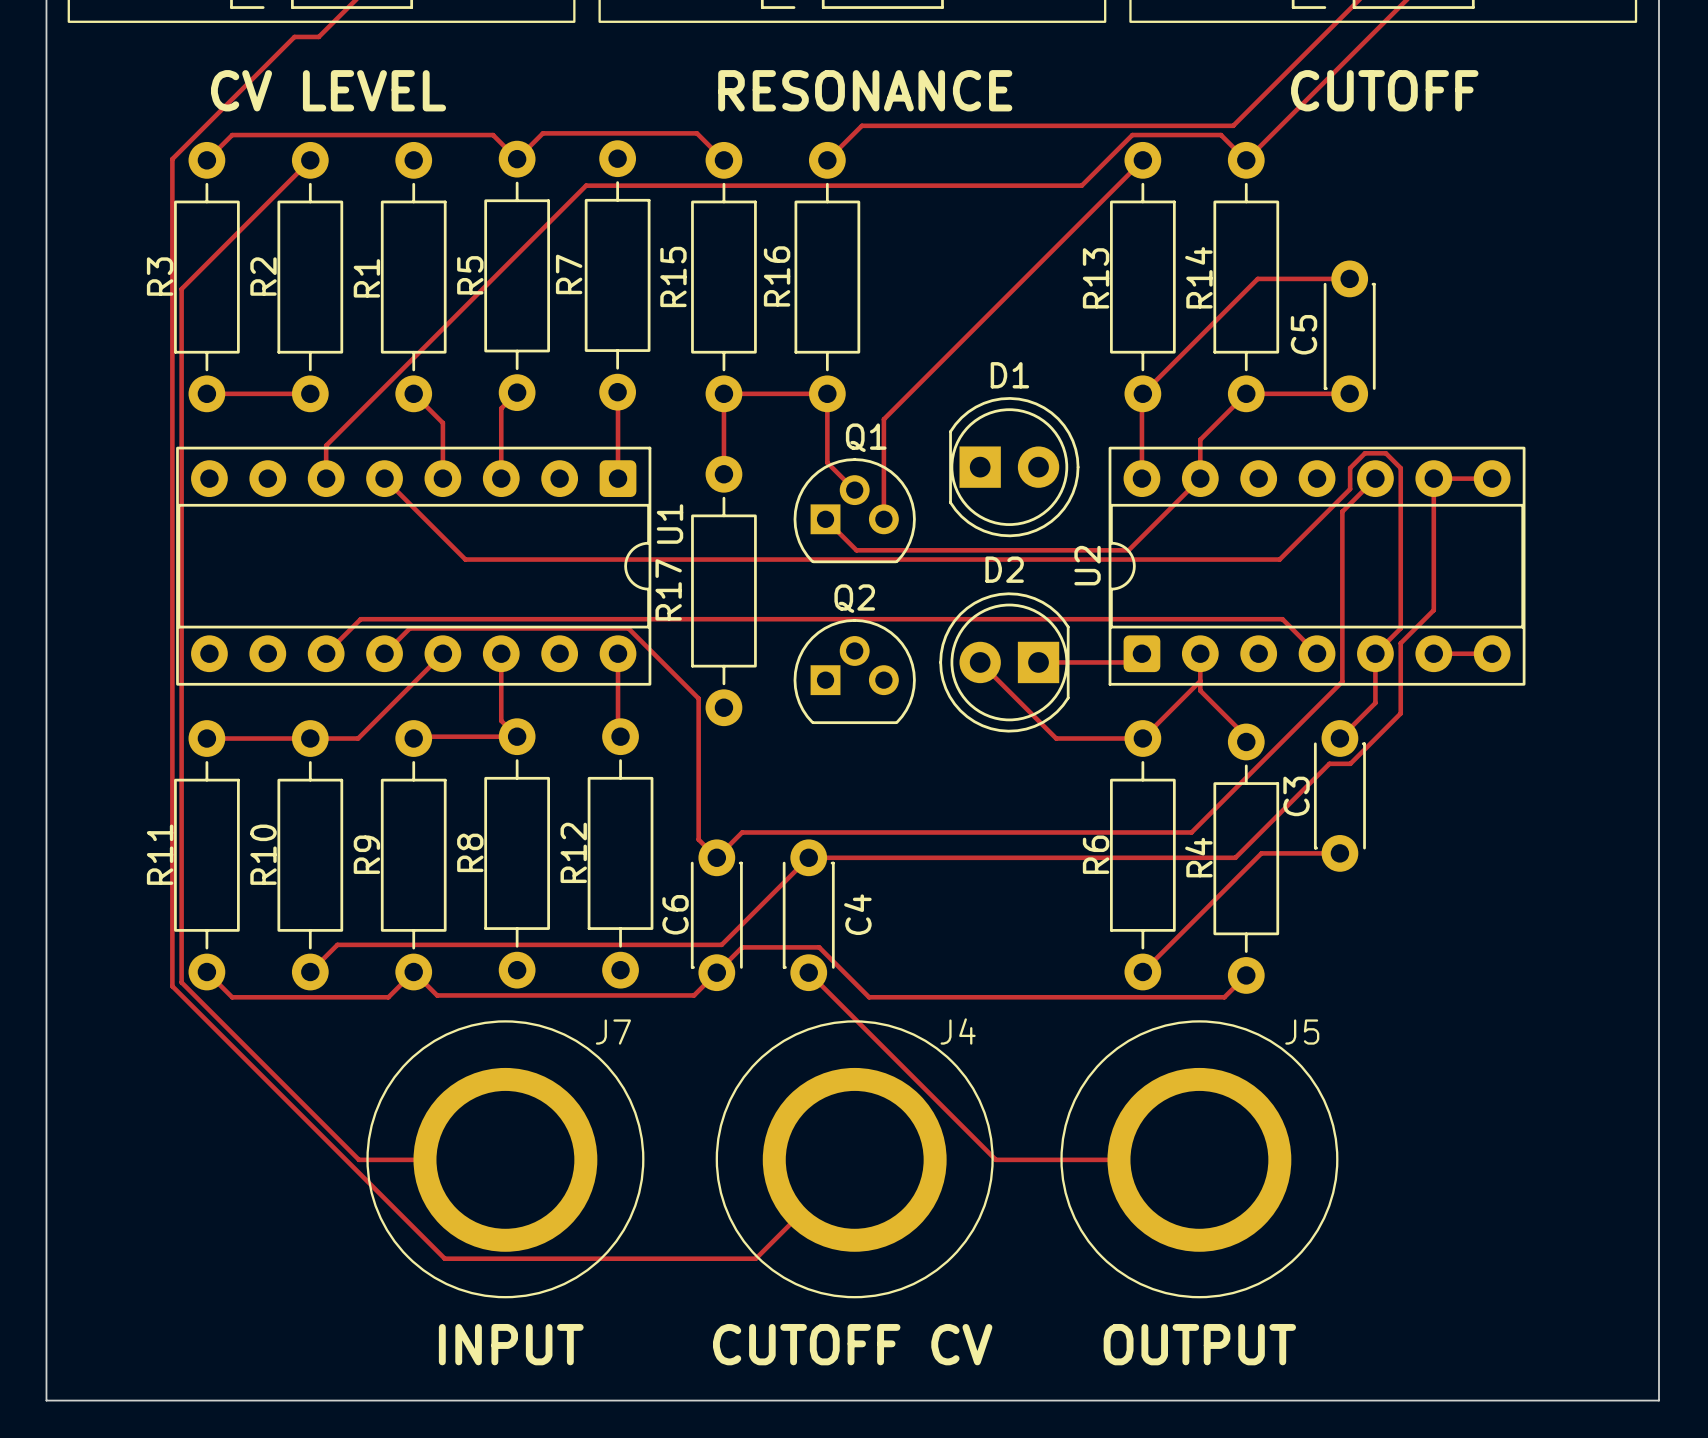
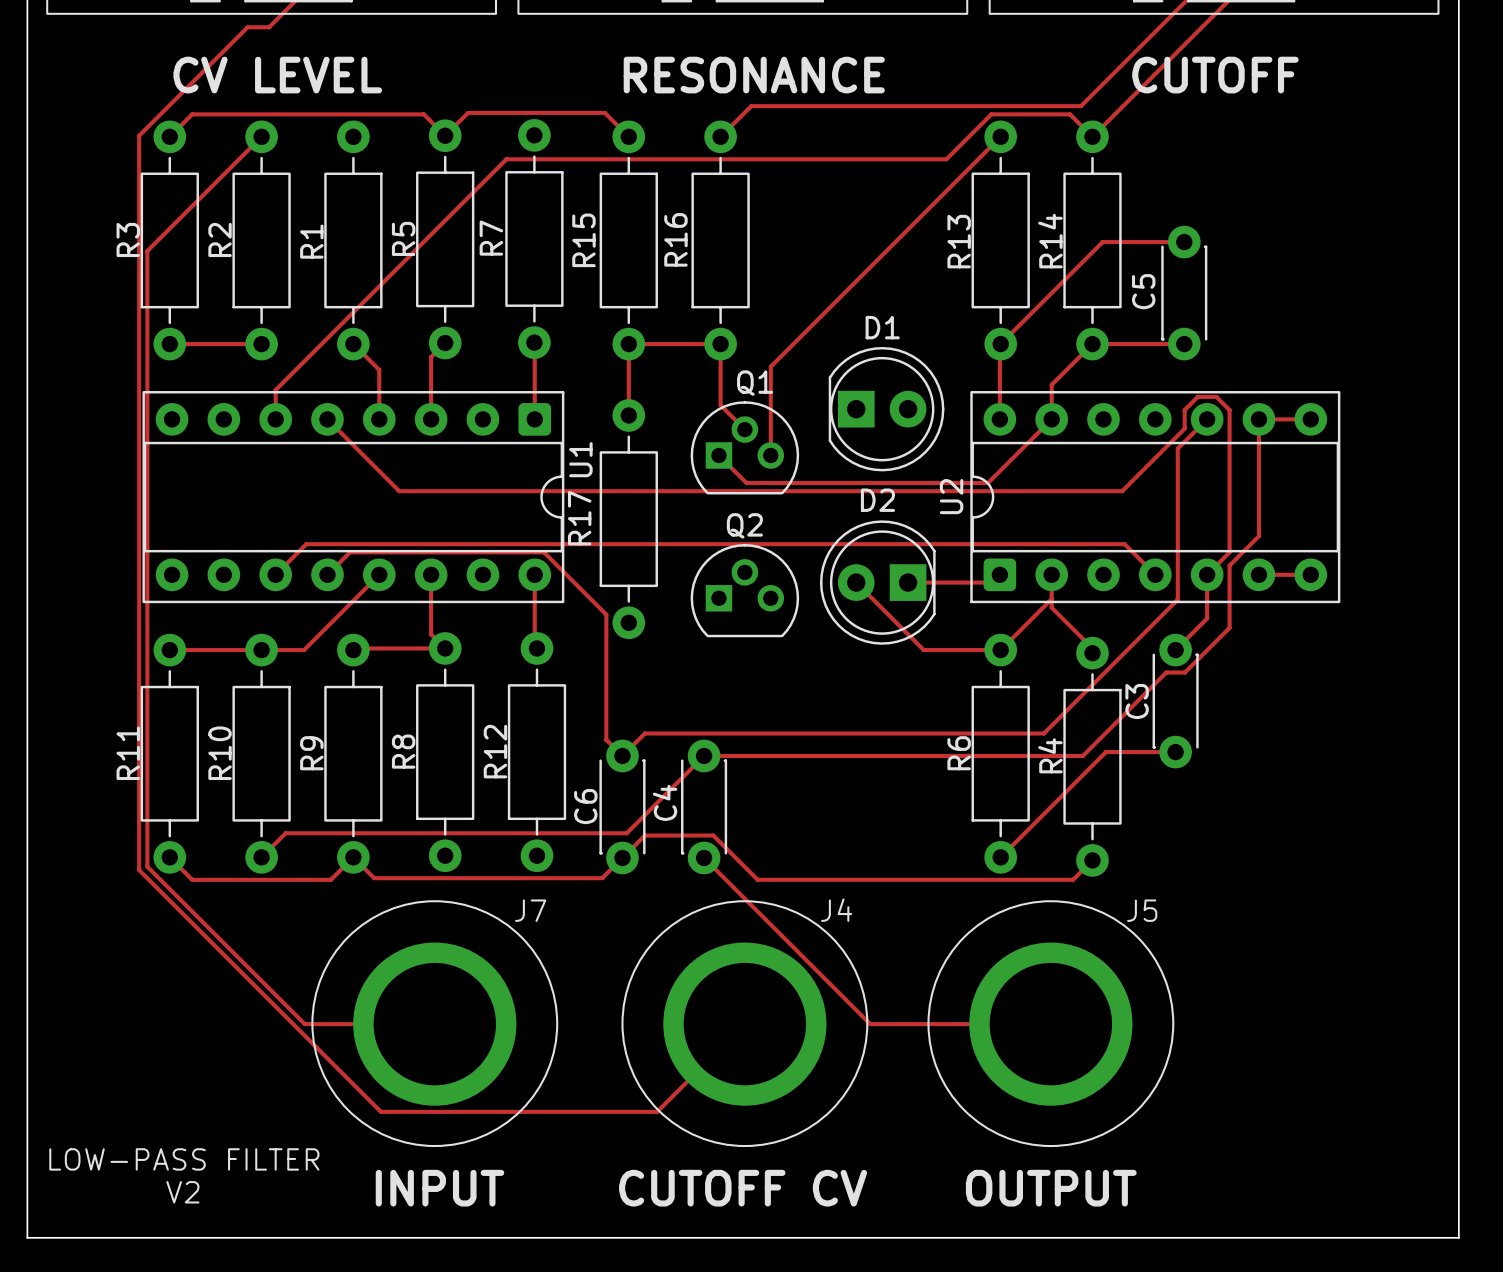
C4 name position: C4 (857, 914) -> C4 (665, 802)
text: none -> LOW-PASS FILTER (184, 1159)
text: none -> V2 (182, 1192)

